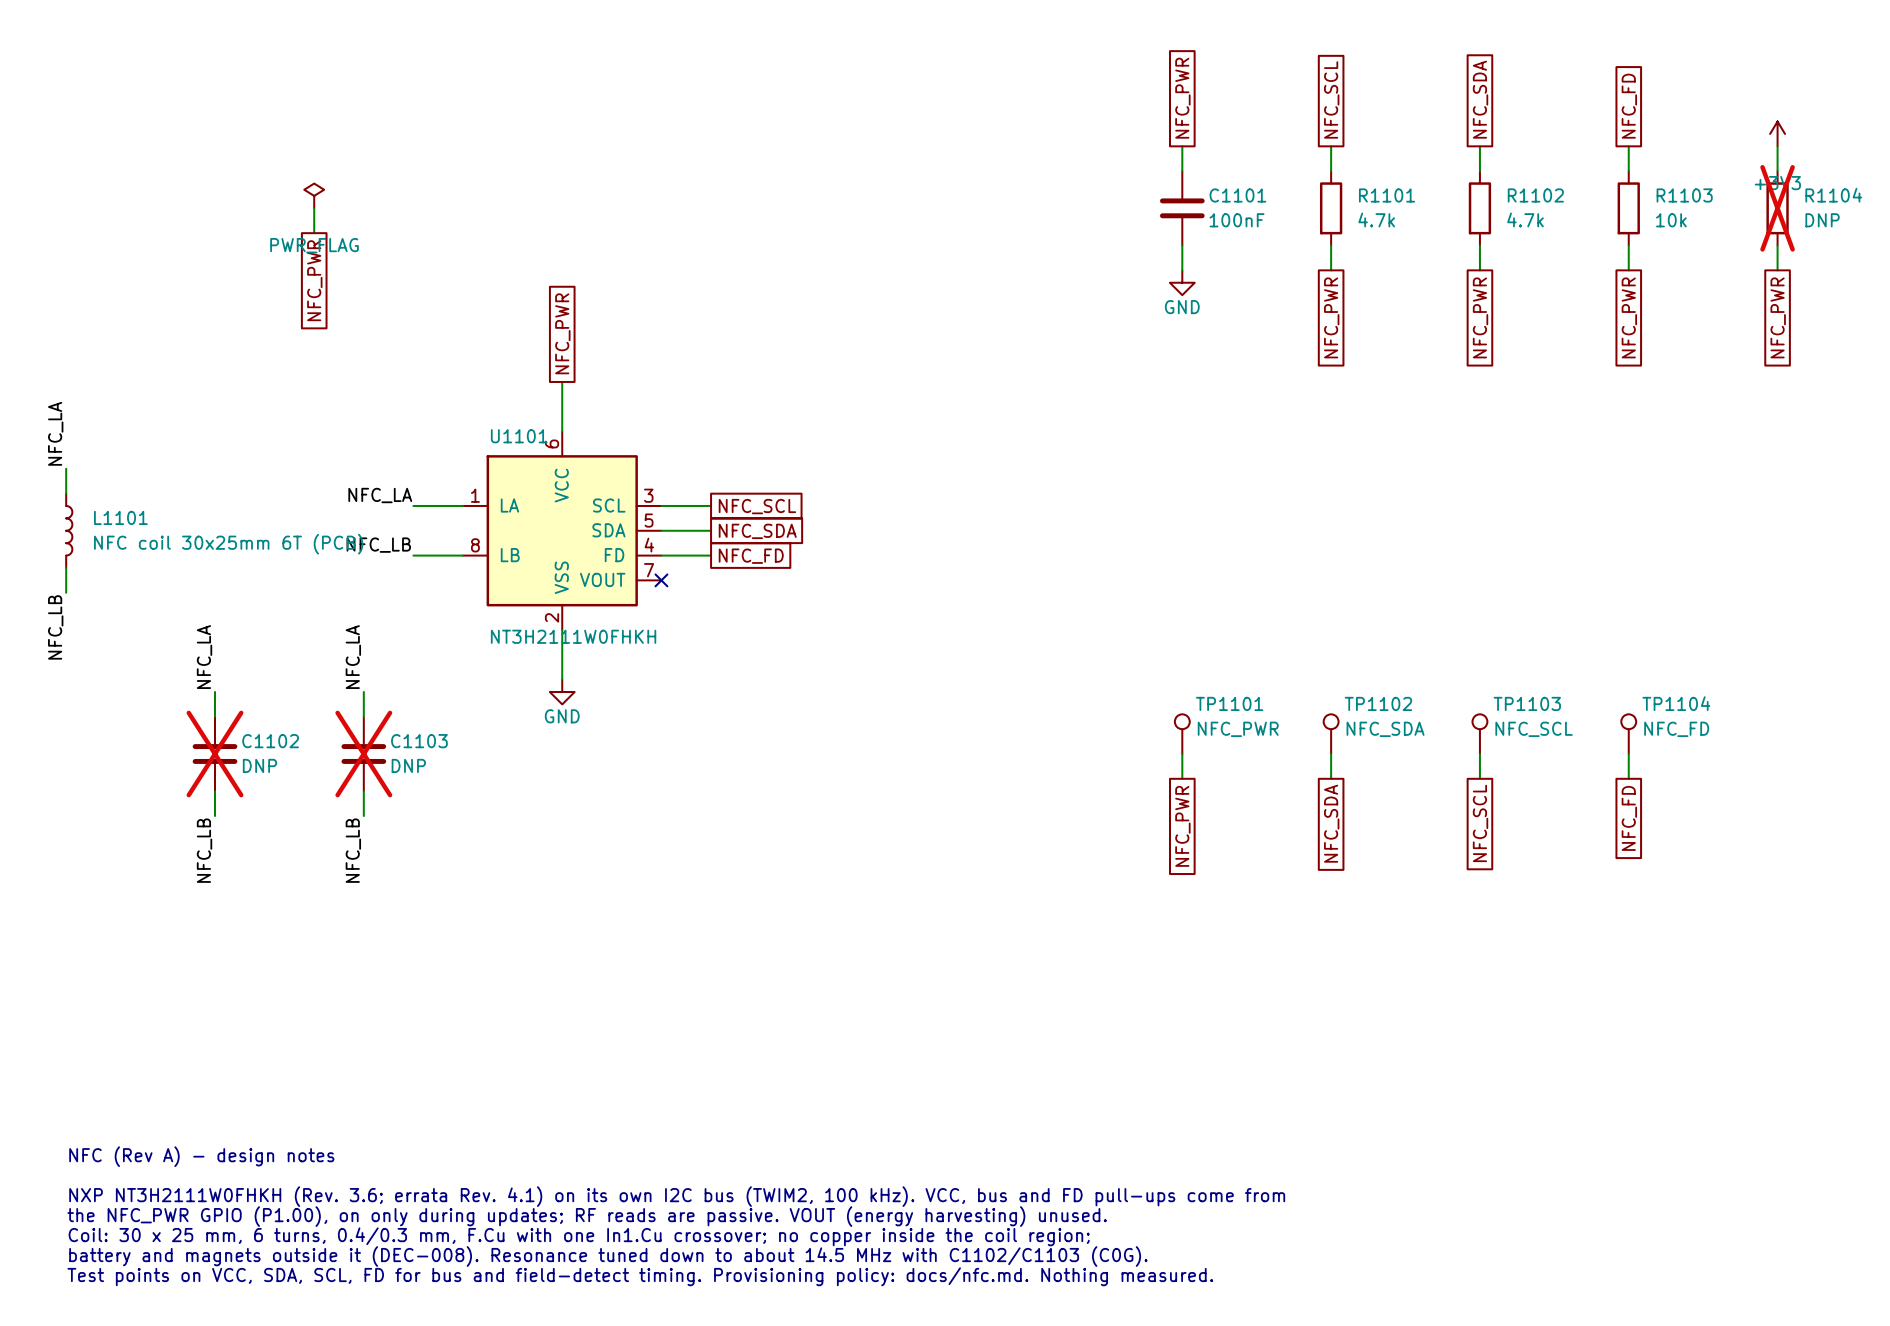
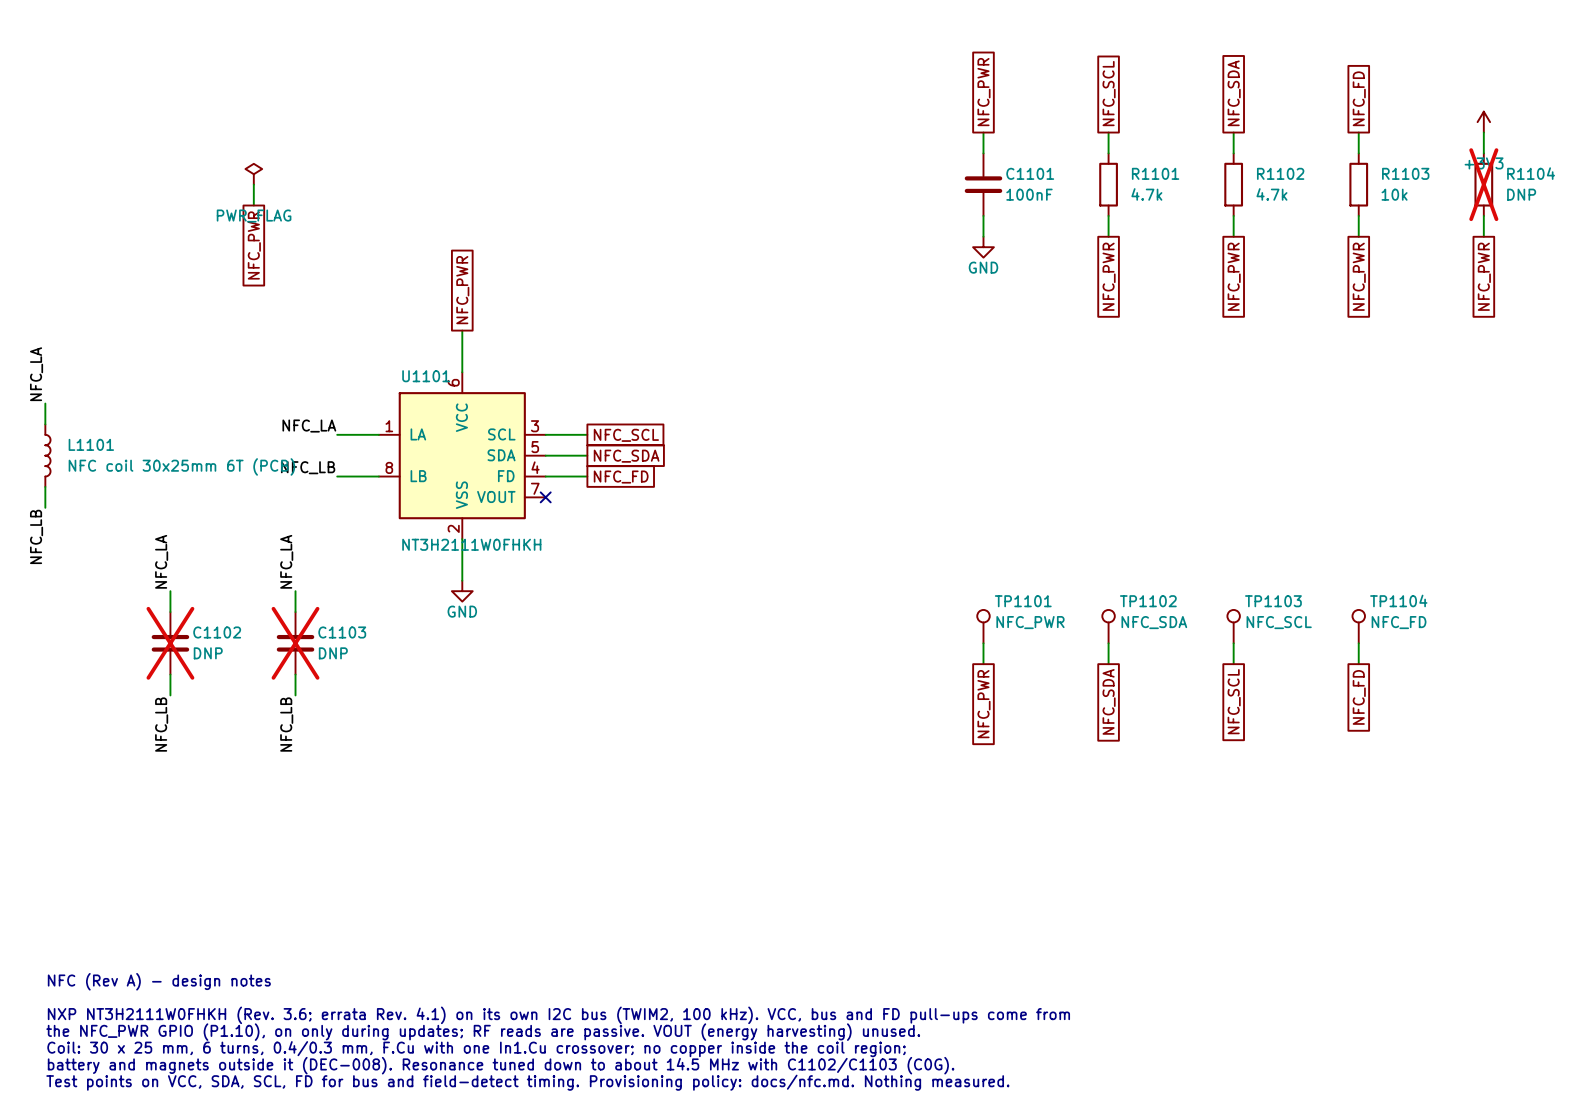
text: the NFC_PWR GPIO (P1.00), on only during updates; RF reads are passive. VOUT (energy harvesting) unused. (587, 1216) -> the NFC_PWR GPIO (P1.10), on only during updates; RF reads are passive. VOUT (energy harvesting) unused. (483, 1032)

